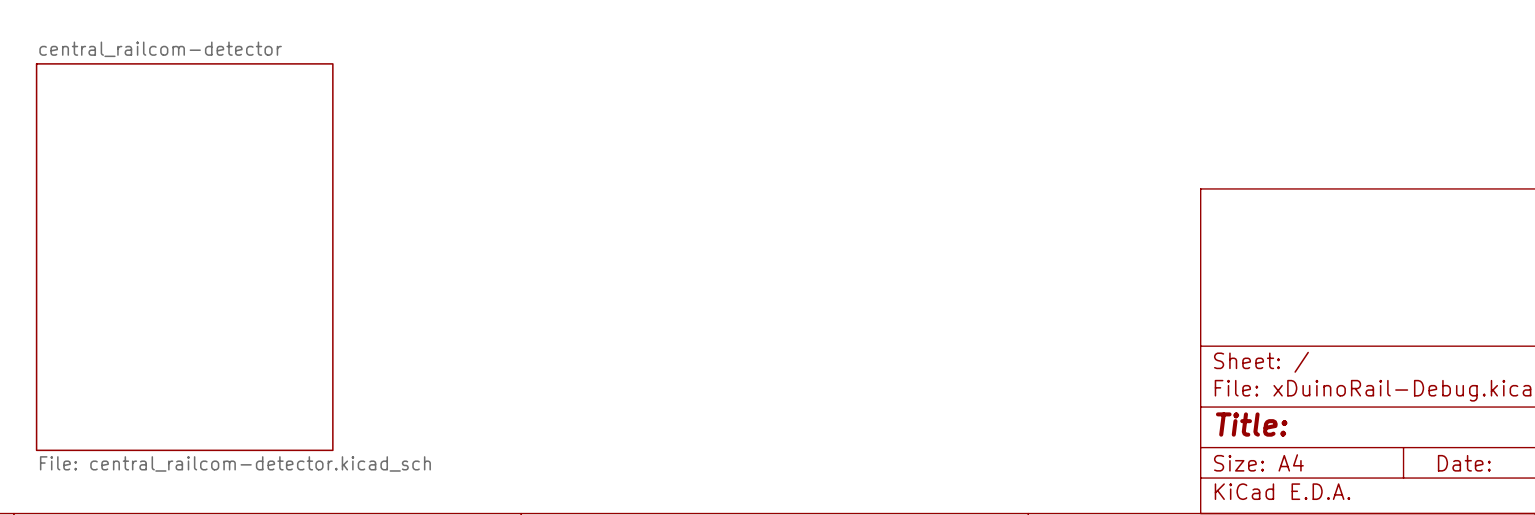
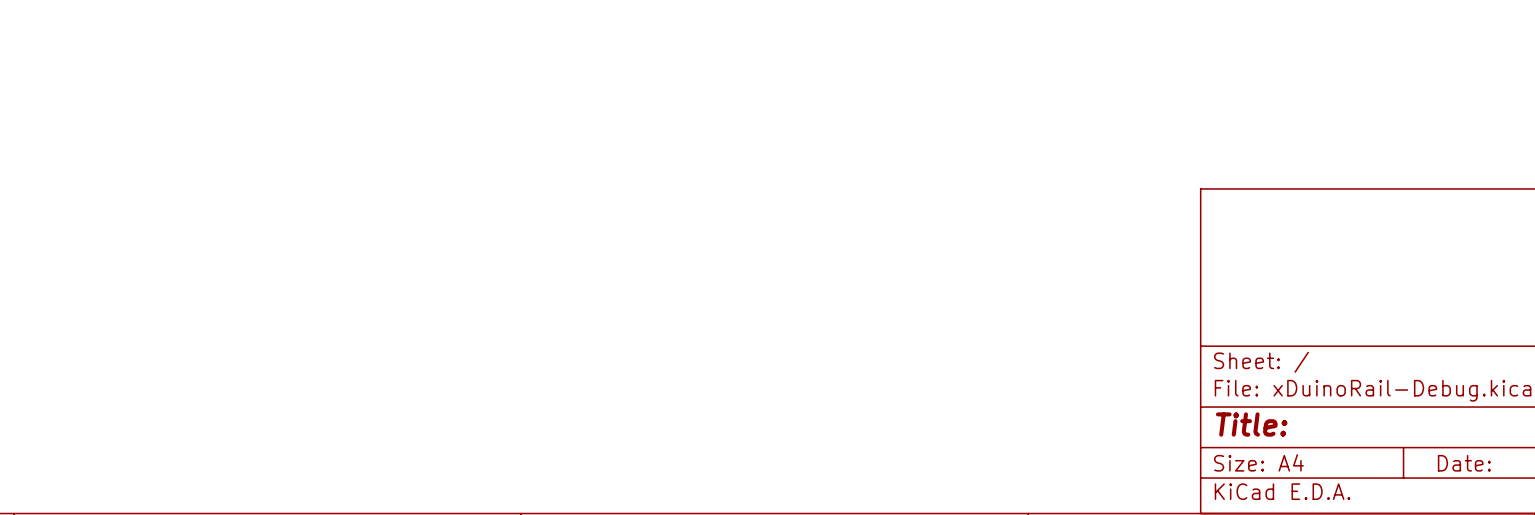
sheet central_railcom-detector: File: central_railcom-detector.kicad_sch (184, 257) -> none

